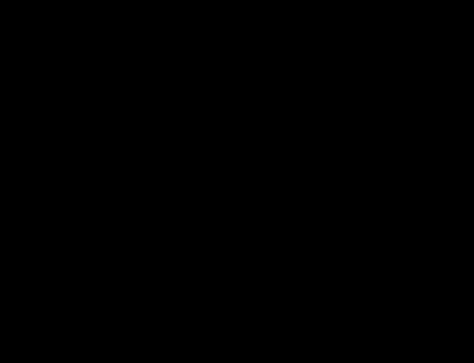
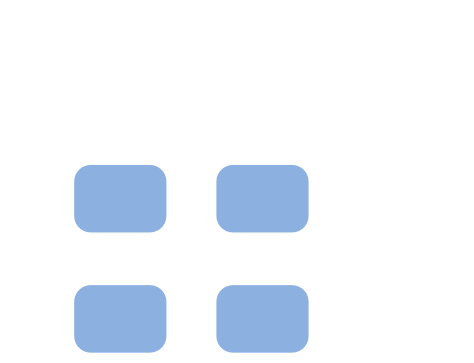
part: none -> (120, 258)
part: none -> (262, 258)

